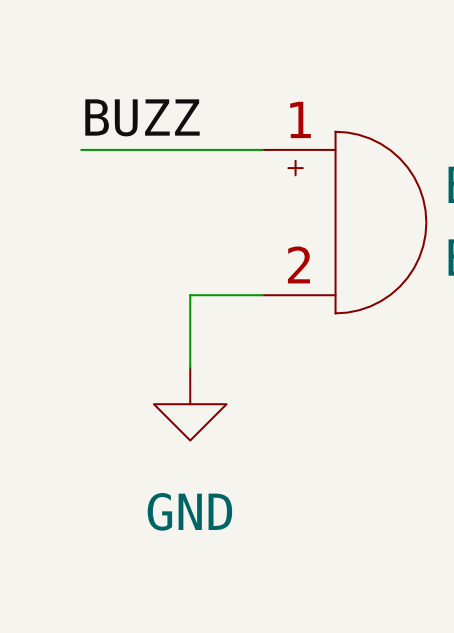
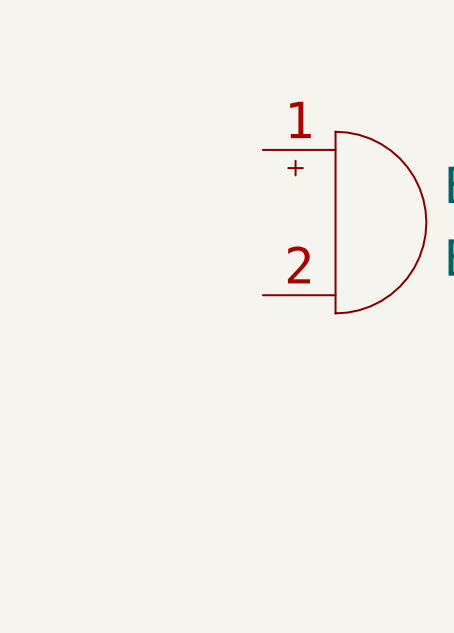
label: BUZZ (142, 117) -> none
wire: (81, 149) (262, 149) -> none
wire: (262, 295) (190, 295) (190, 367) -> none
power symbol: GND (190, 404) -> none

